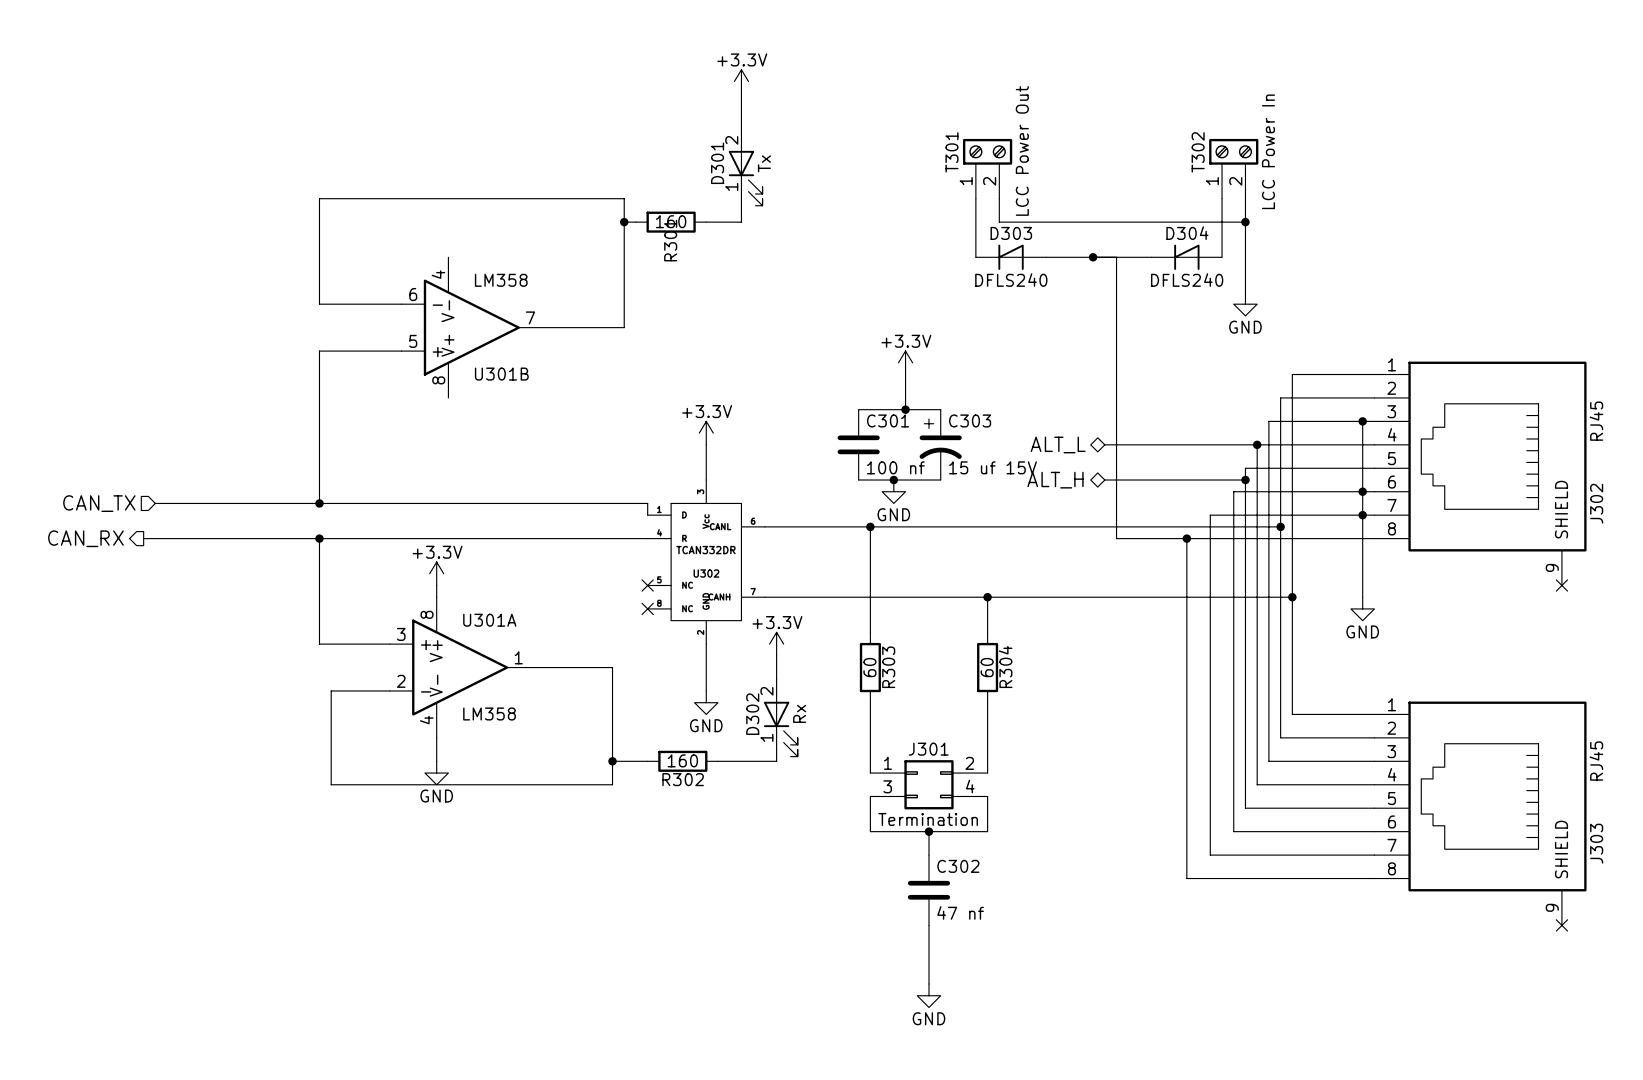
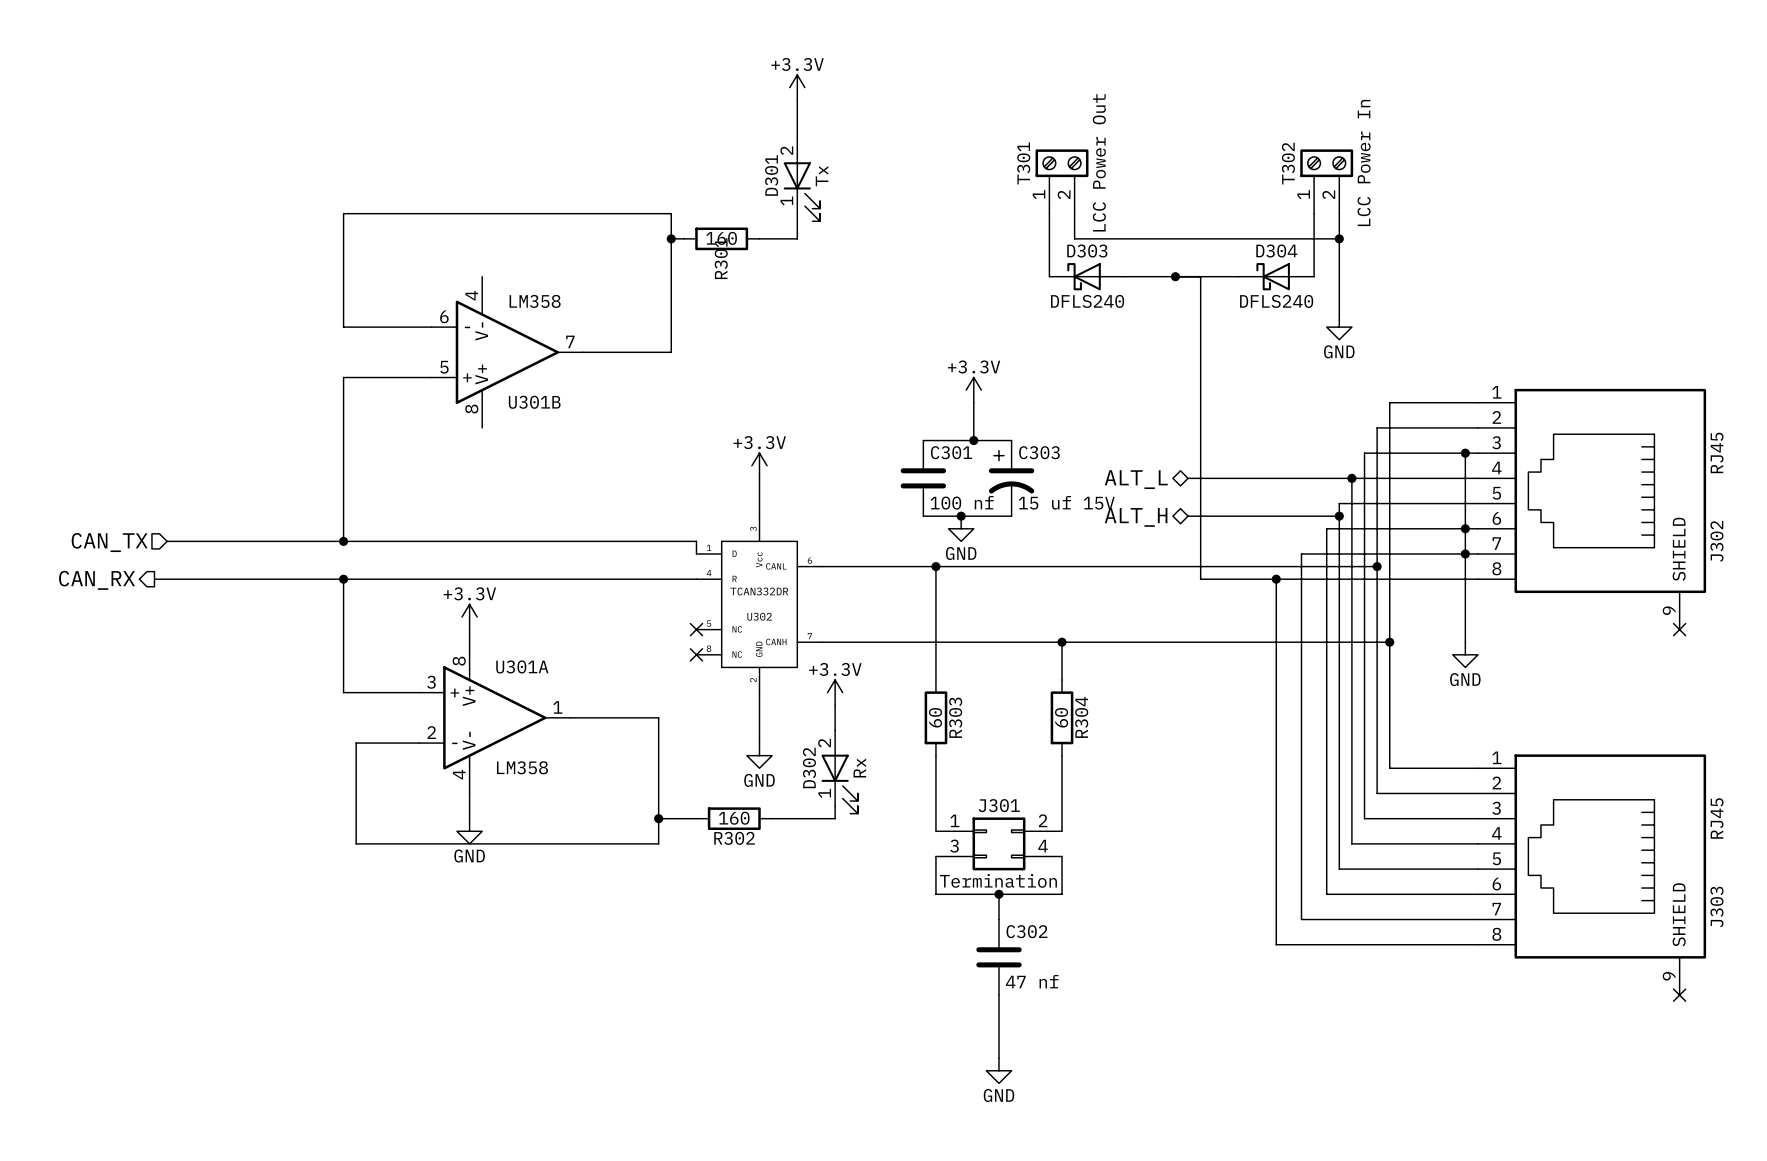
D303 symbol: [975, 244, 1047, 270] -> [1049, 263, 1126, 291]
D304 symbol: [1151, 244, 1223, 270] -> [1238, 263, 1315, 291]

